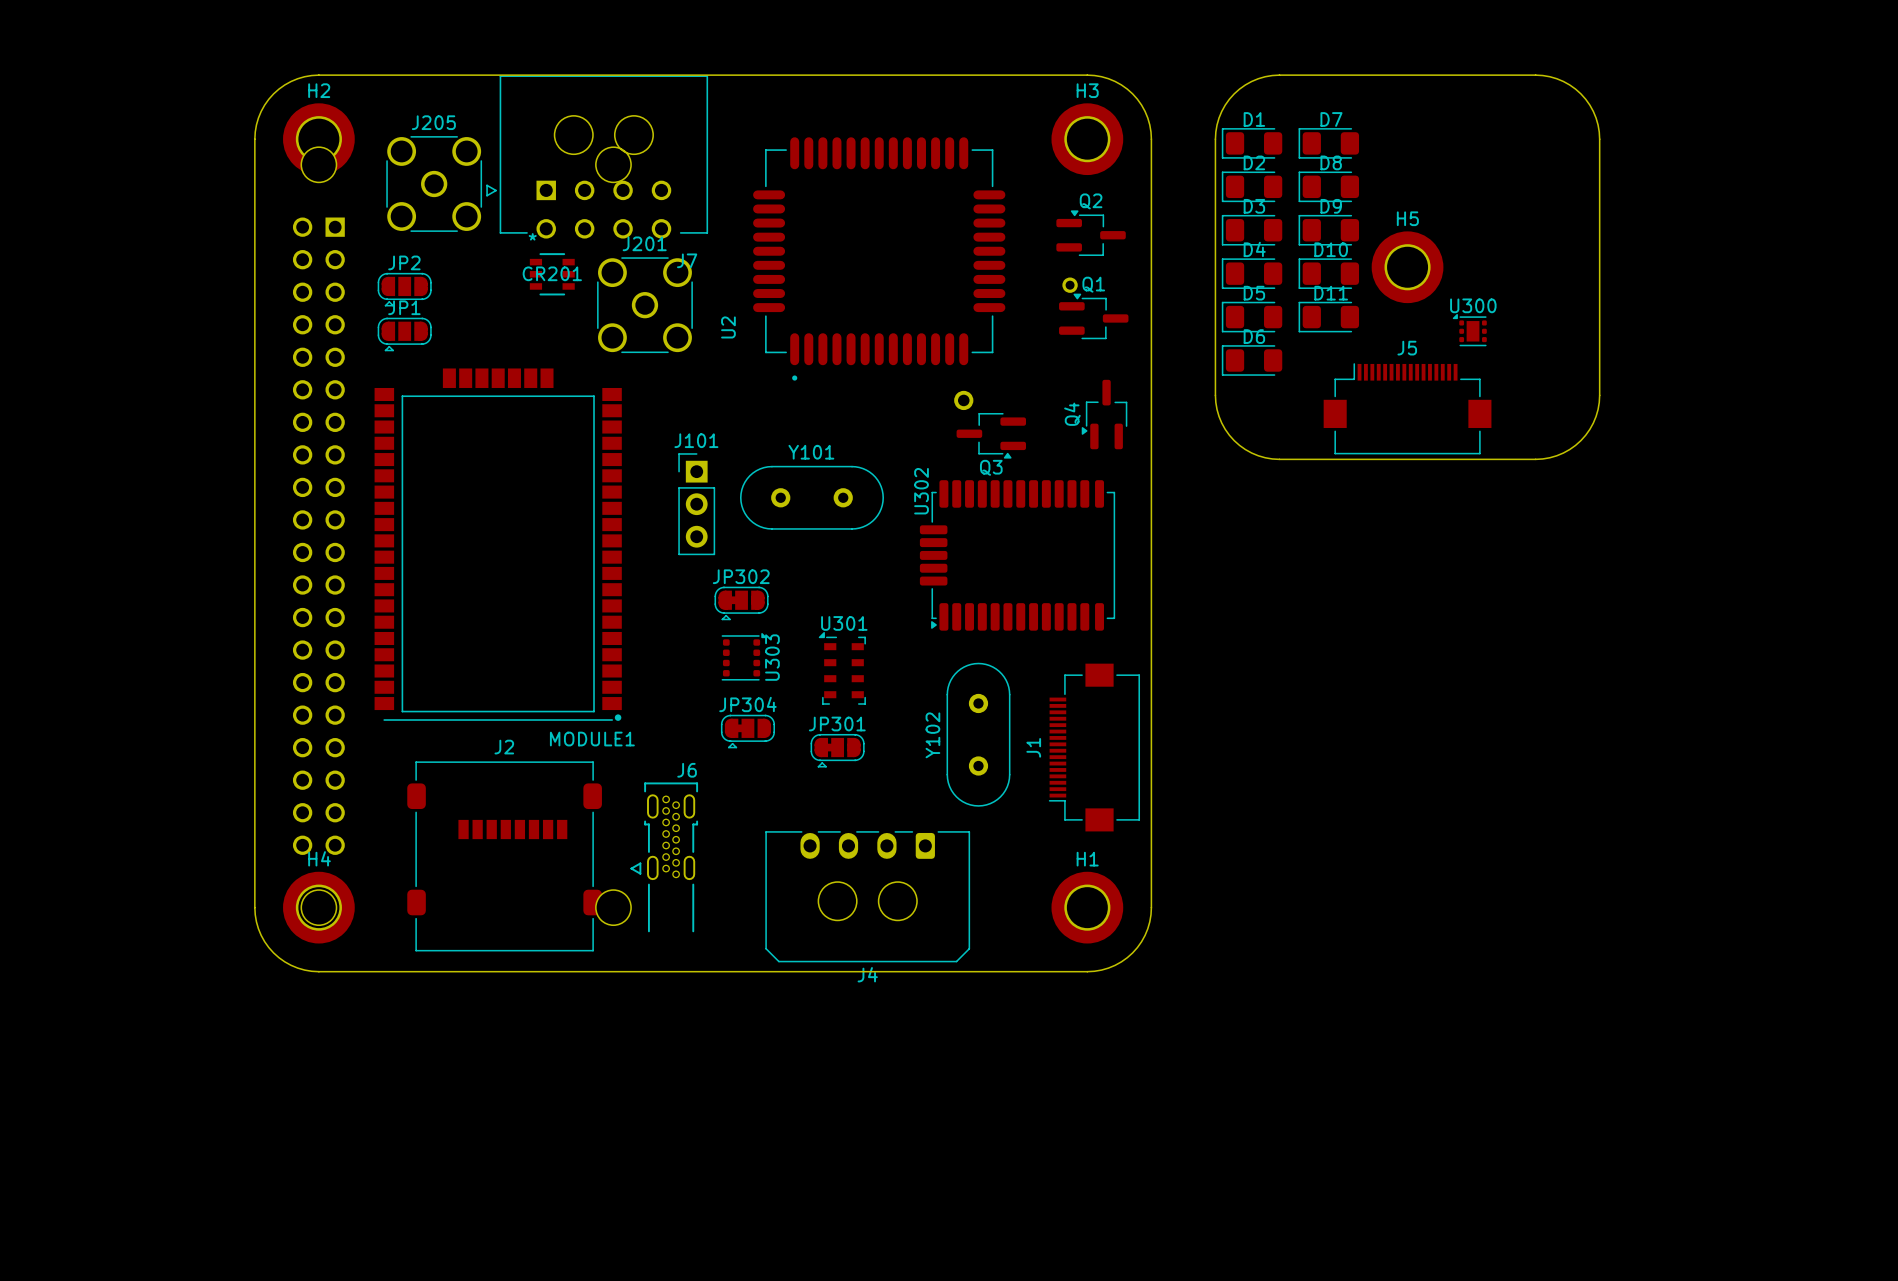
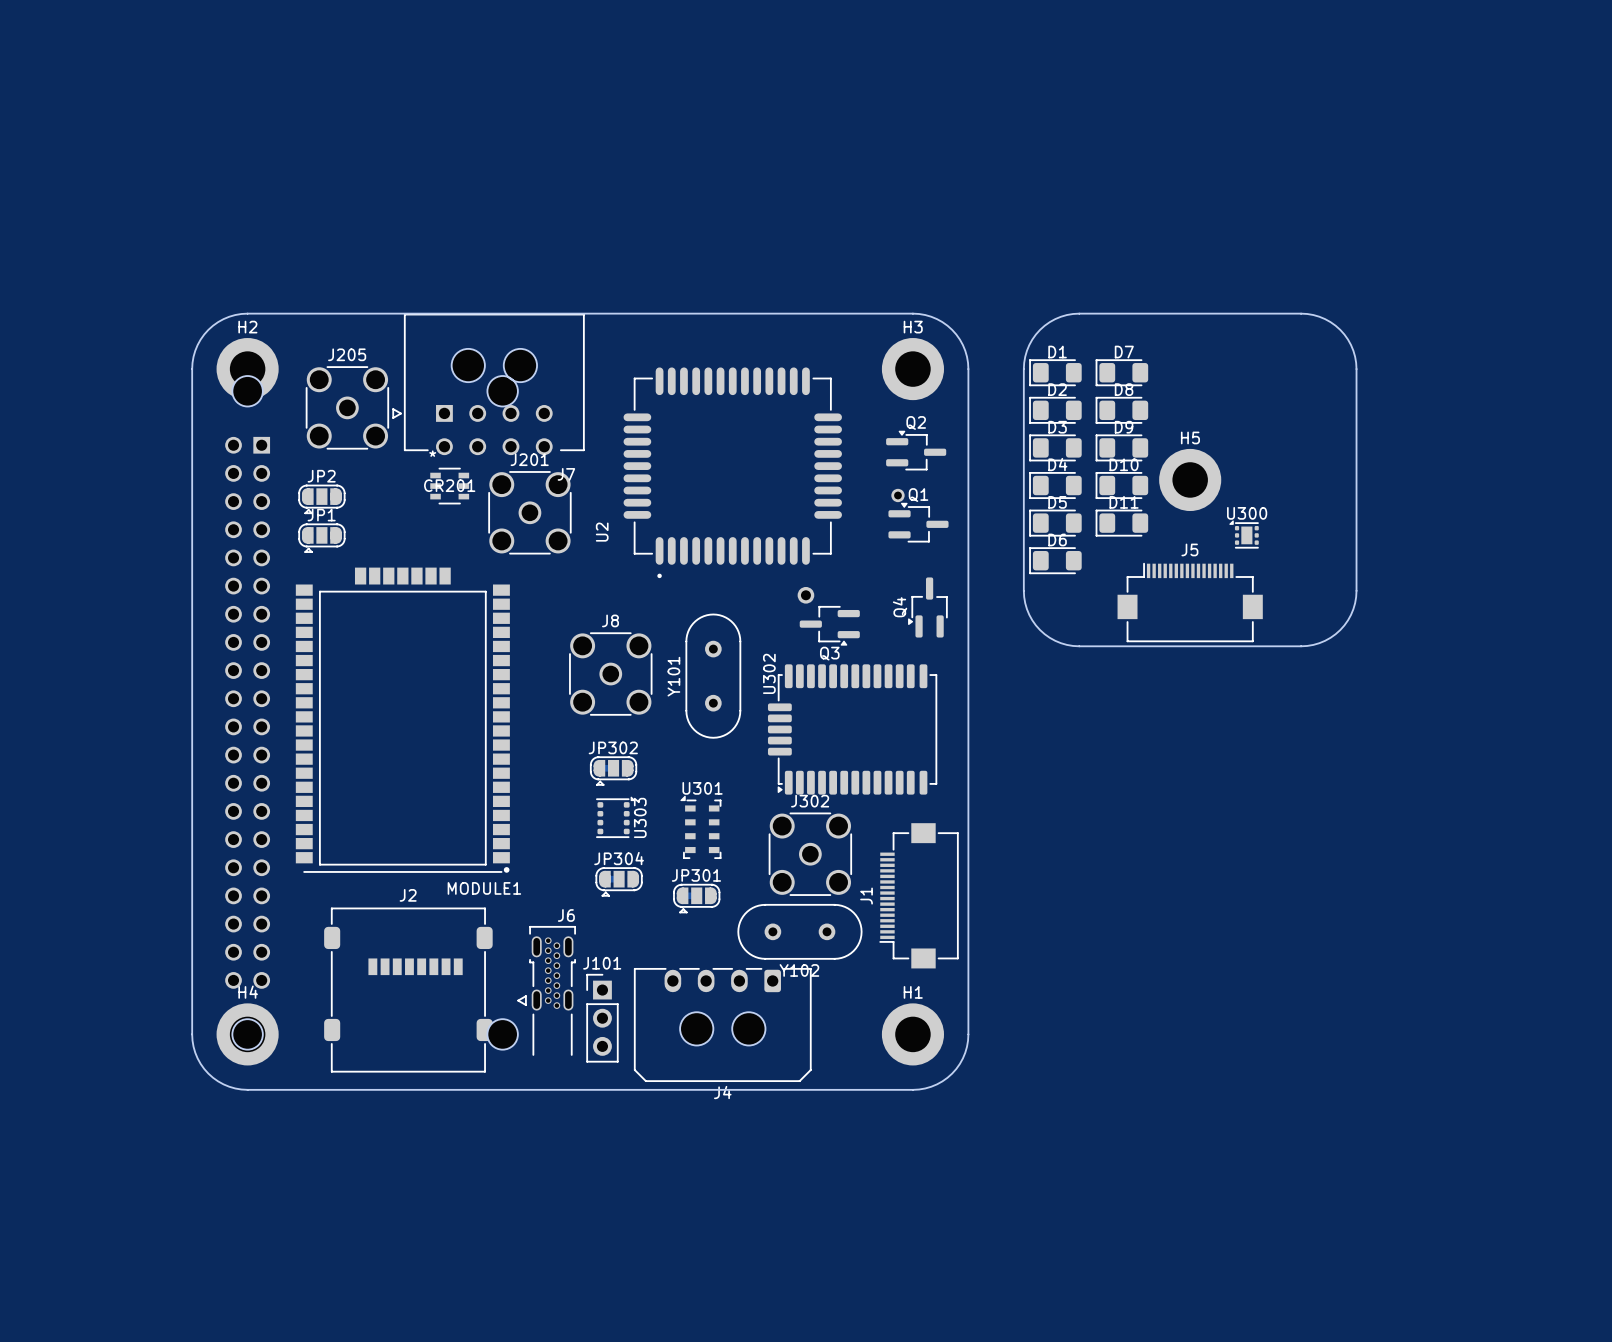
J8: none -> (610, 674)
Y101 rotation: 0° (811, 497) -> 90° counterclockwise (713, 676)
J101 position: (696, 504) -> (602, 1018)
J302: none -> (810, 854)
Y102 rotation: 0° (978, 734) -> 90° counterclockwise (799, 931)

